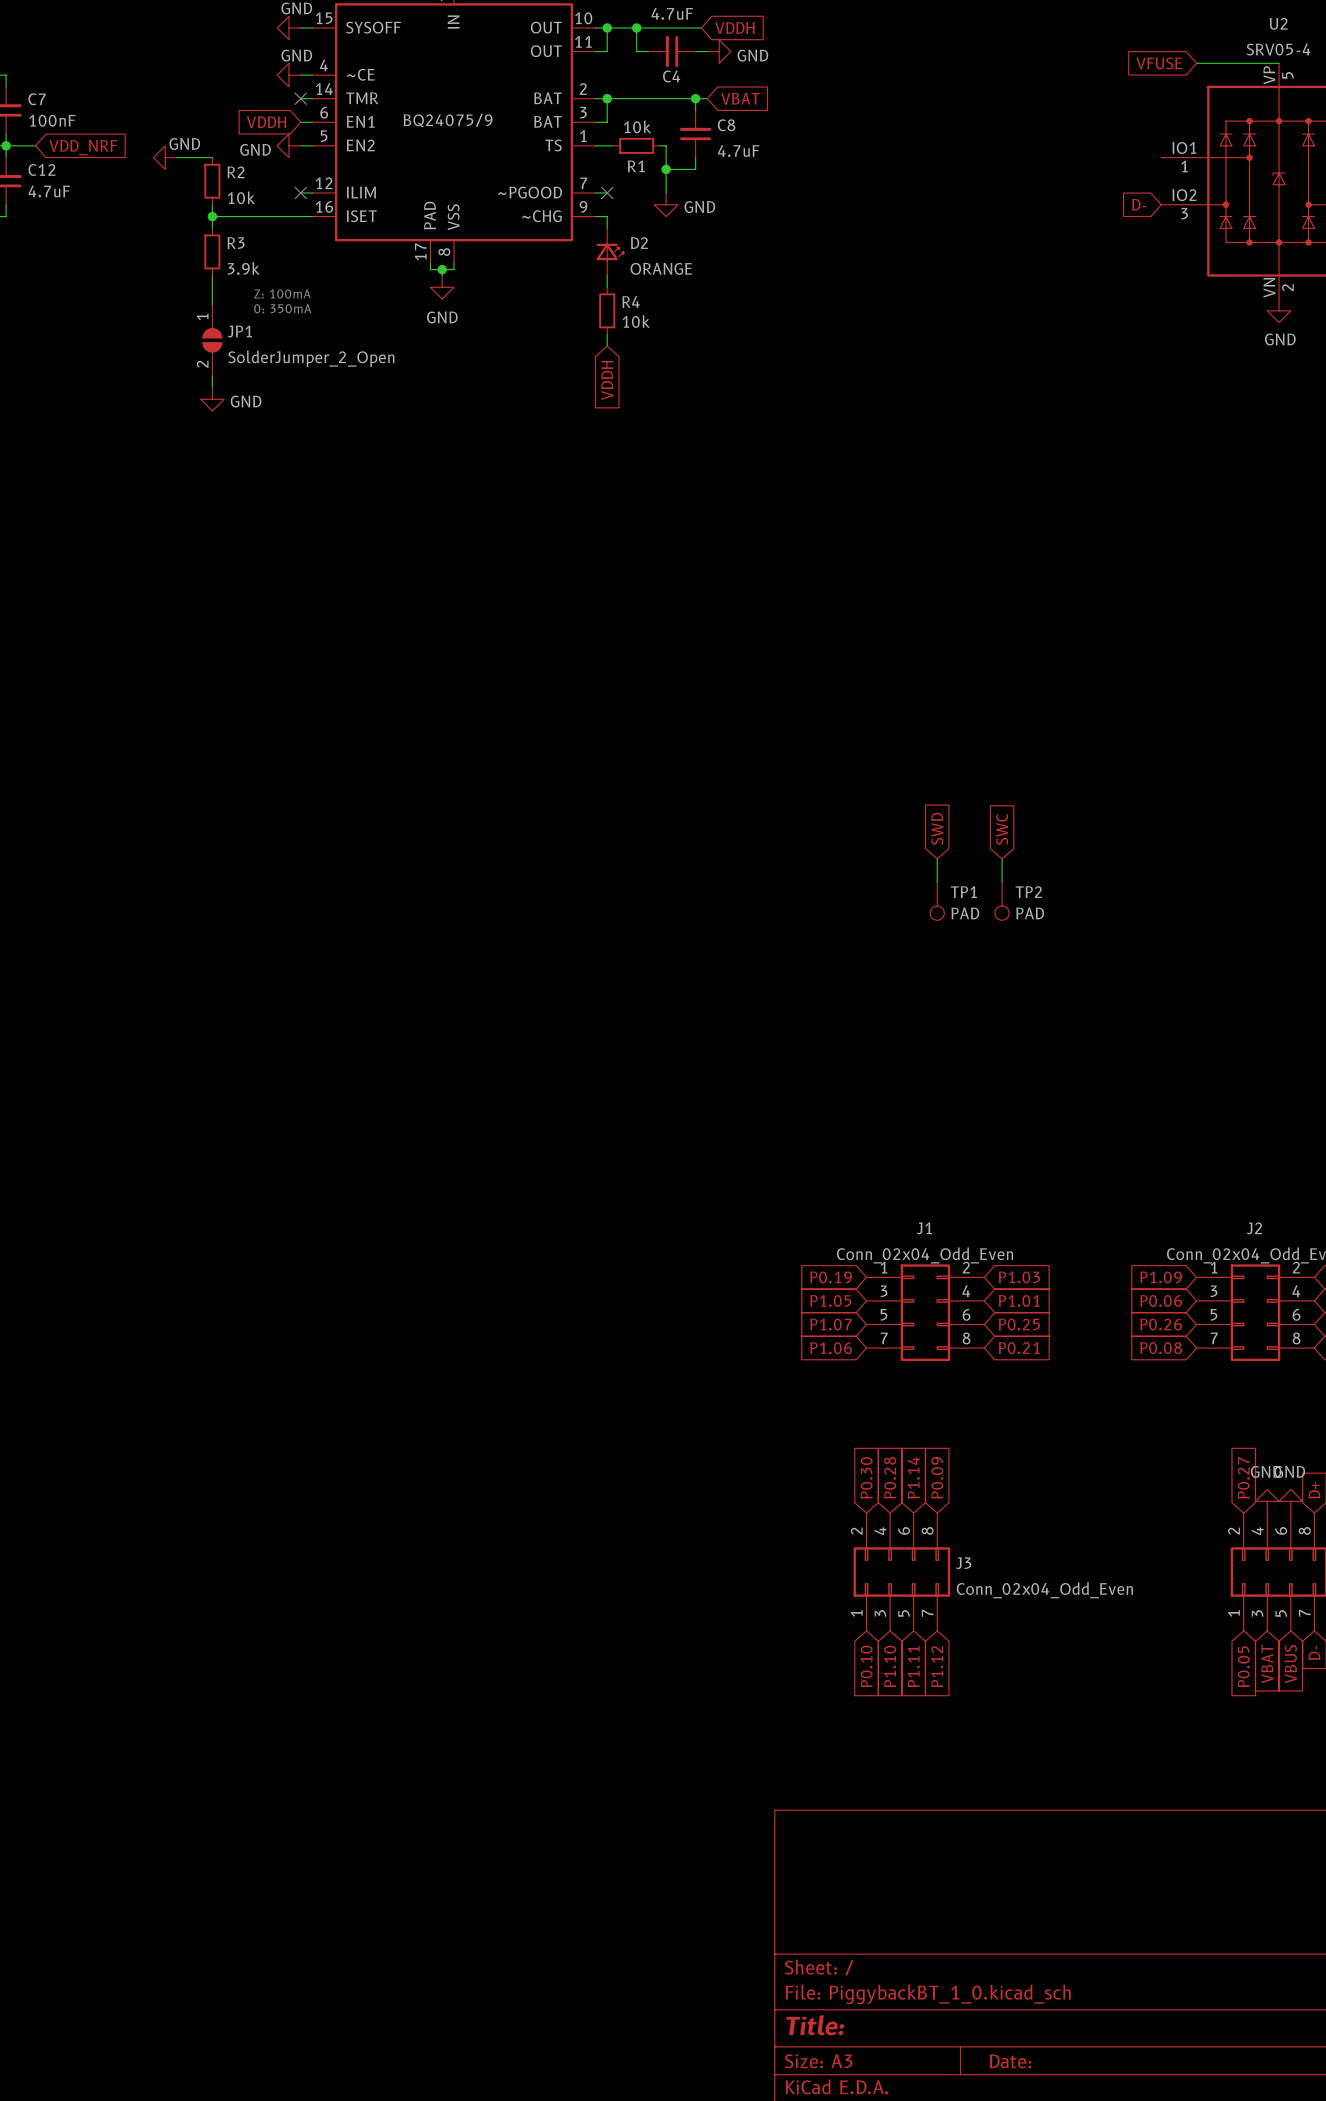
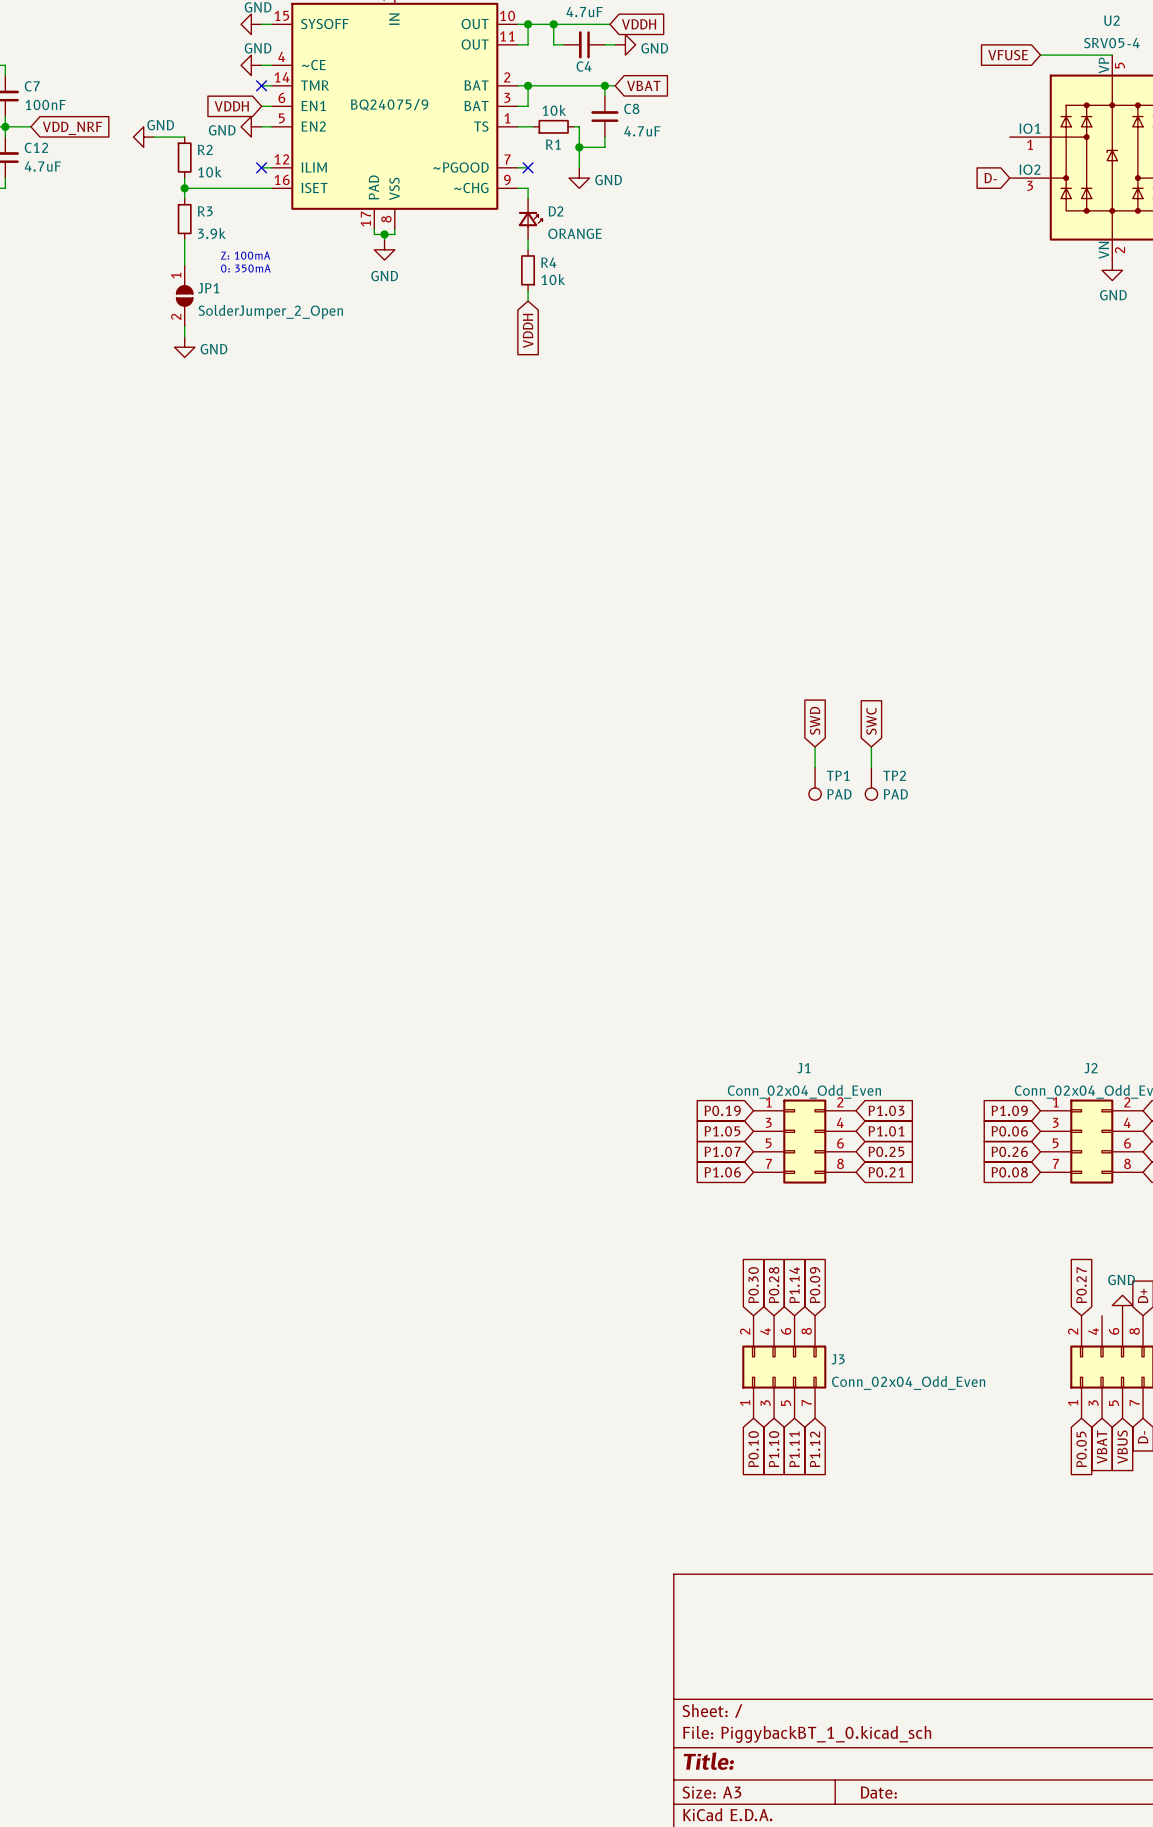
power symbol: GND (1267, 1501) -> none

